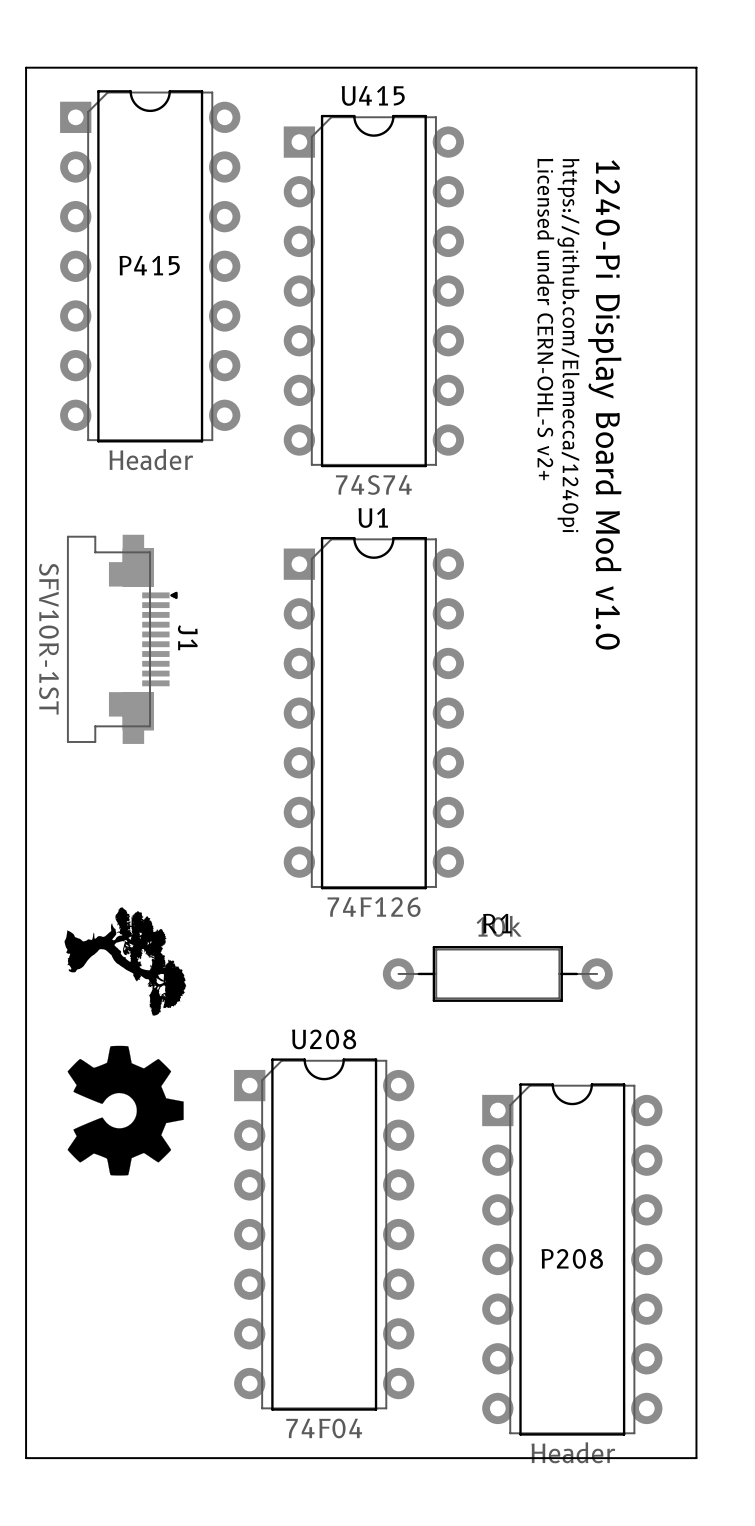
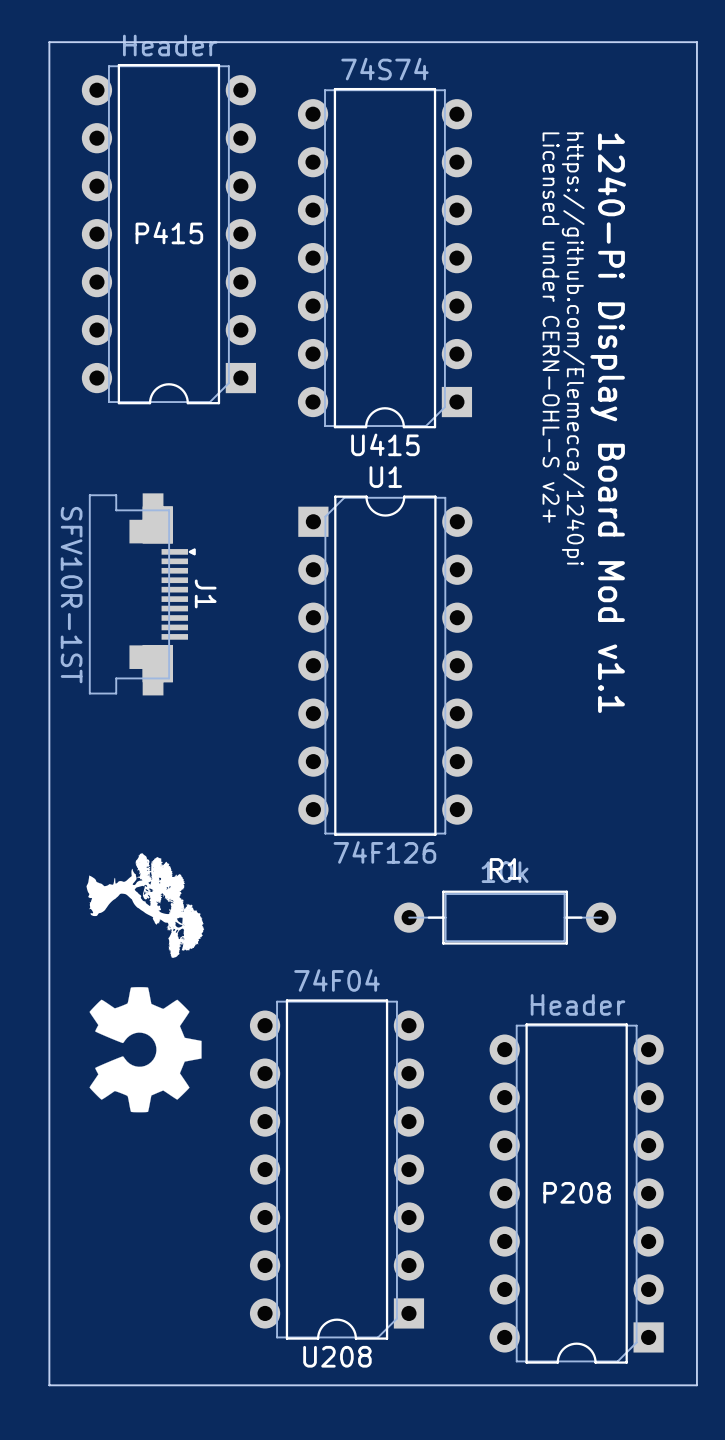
P415 rotation: 0° (150, 266) -> 180° (168, 234)
U415 rotation: 0° (373, 291) -> 180° (384, 258)
text: 1240-Pi Display Board Mod v1.0 (604, 404) -> 1240-Pi Display Board Mod v1.1 (608, 423)
U208 rotation: 0° (324, 1234) -> 180° (337, 1169)
P208 rotation: 0° (572, 1259) -> 180° (576, 1193)

